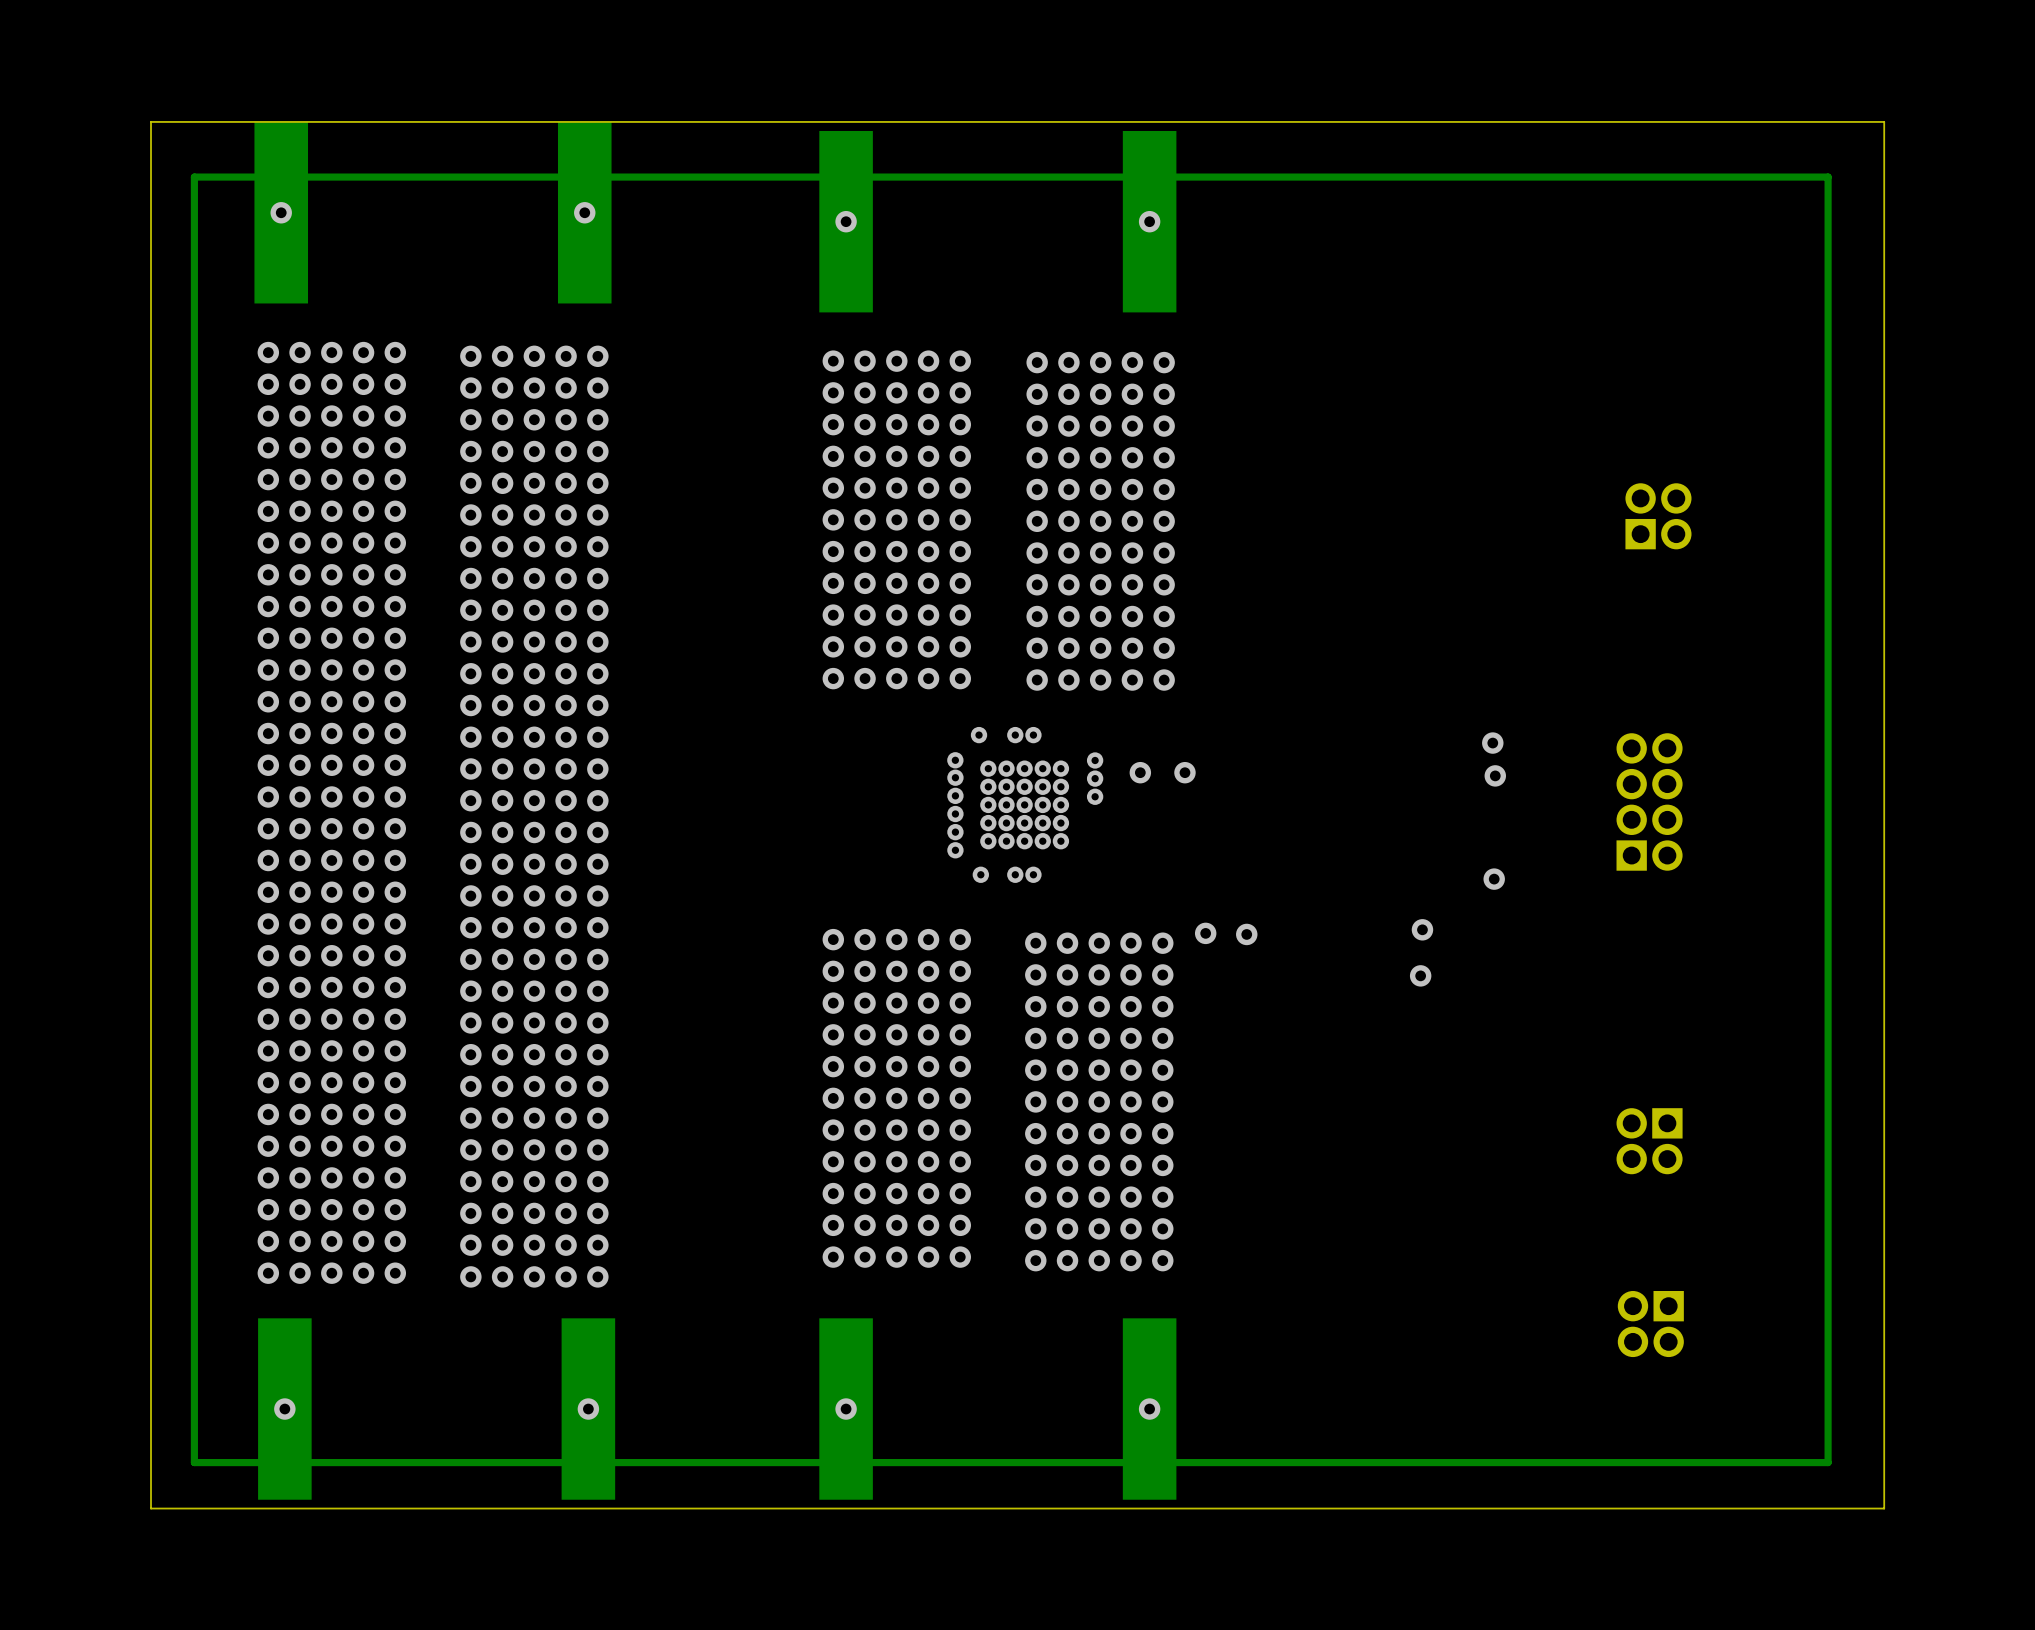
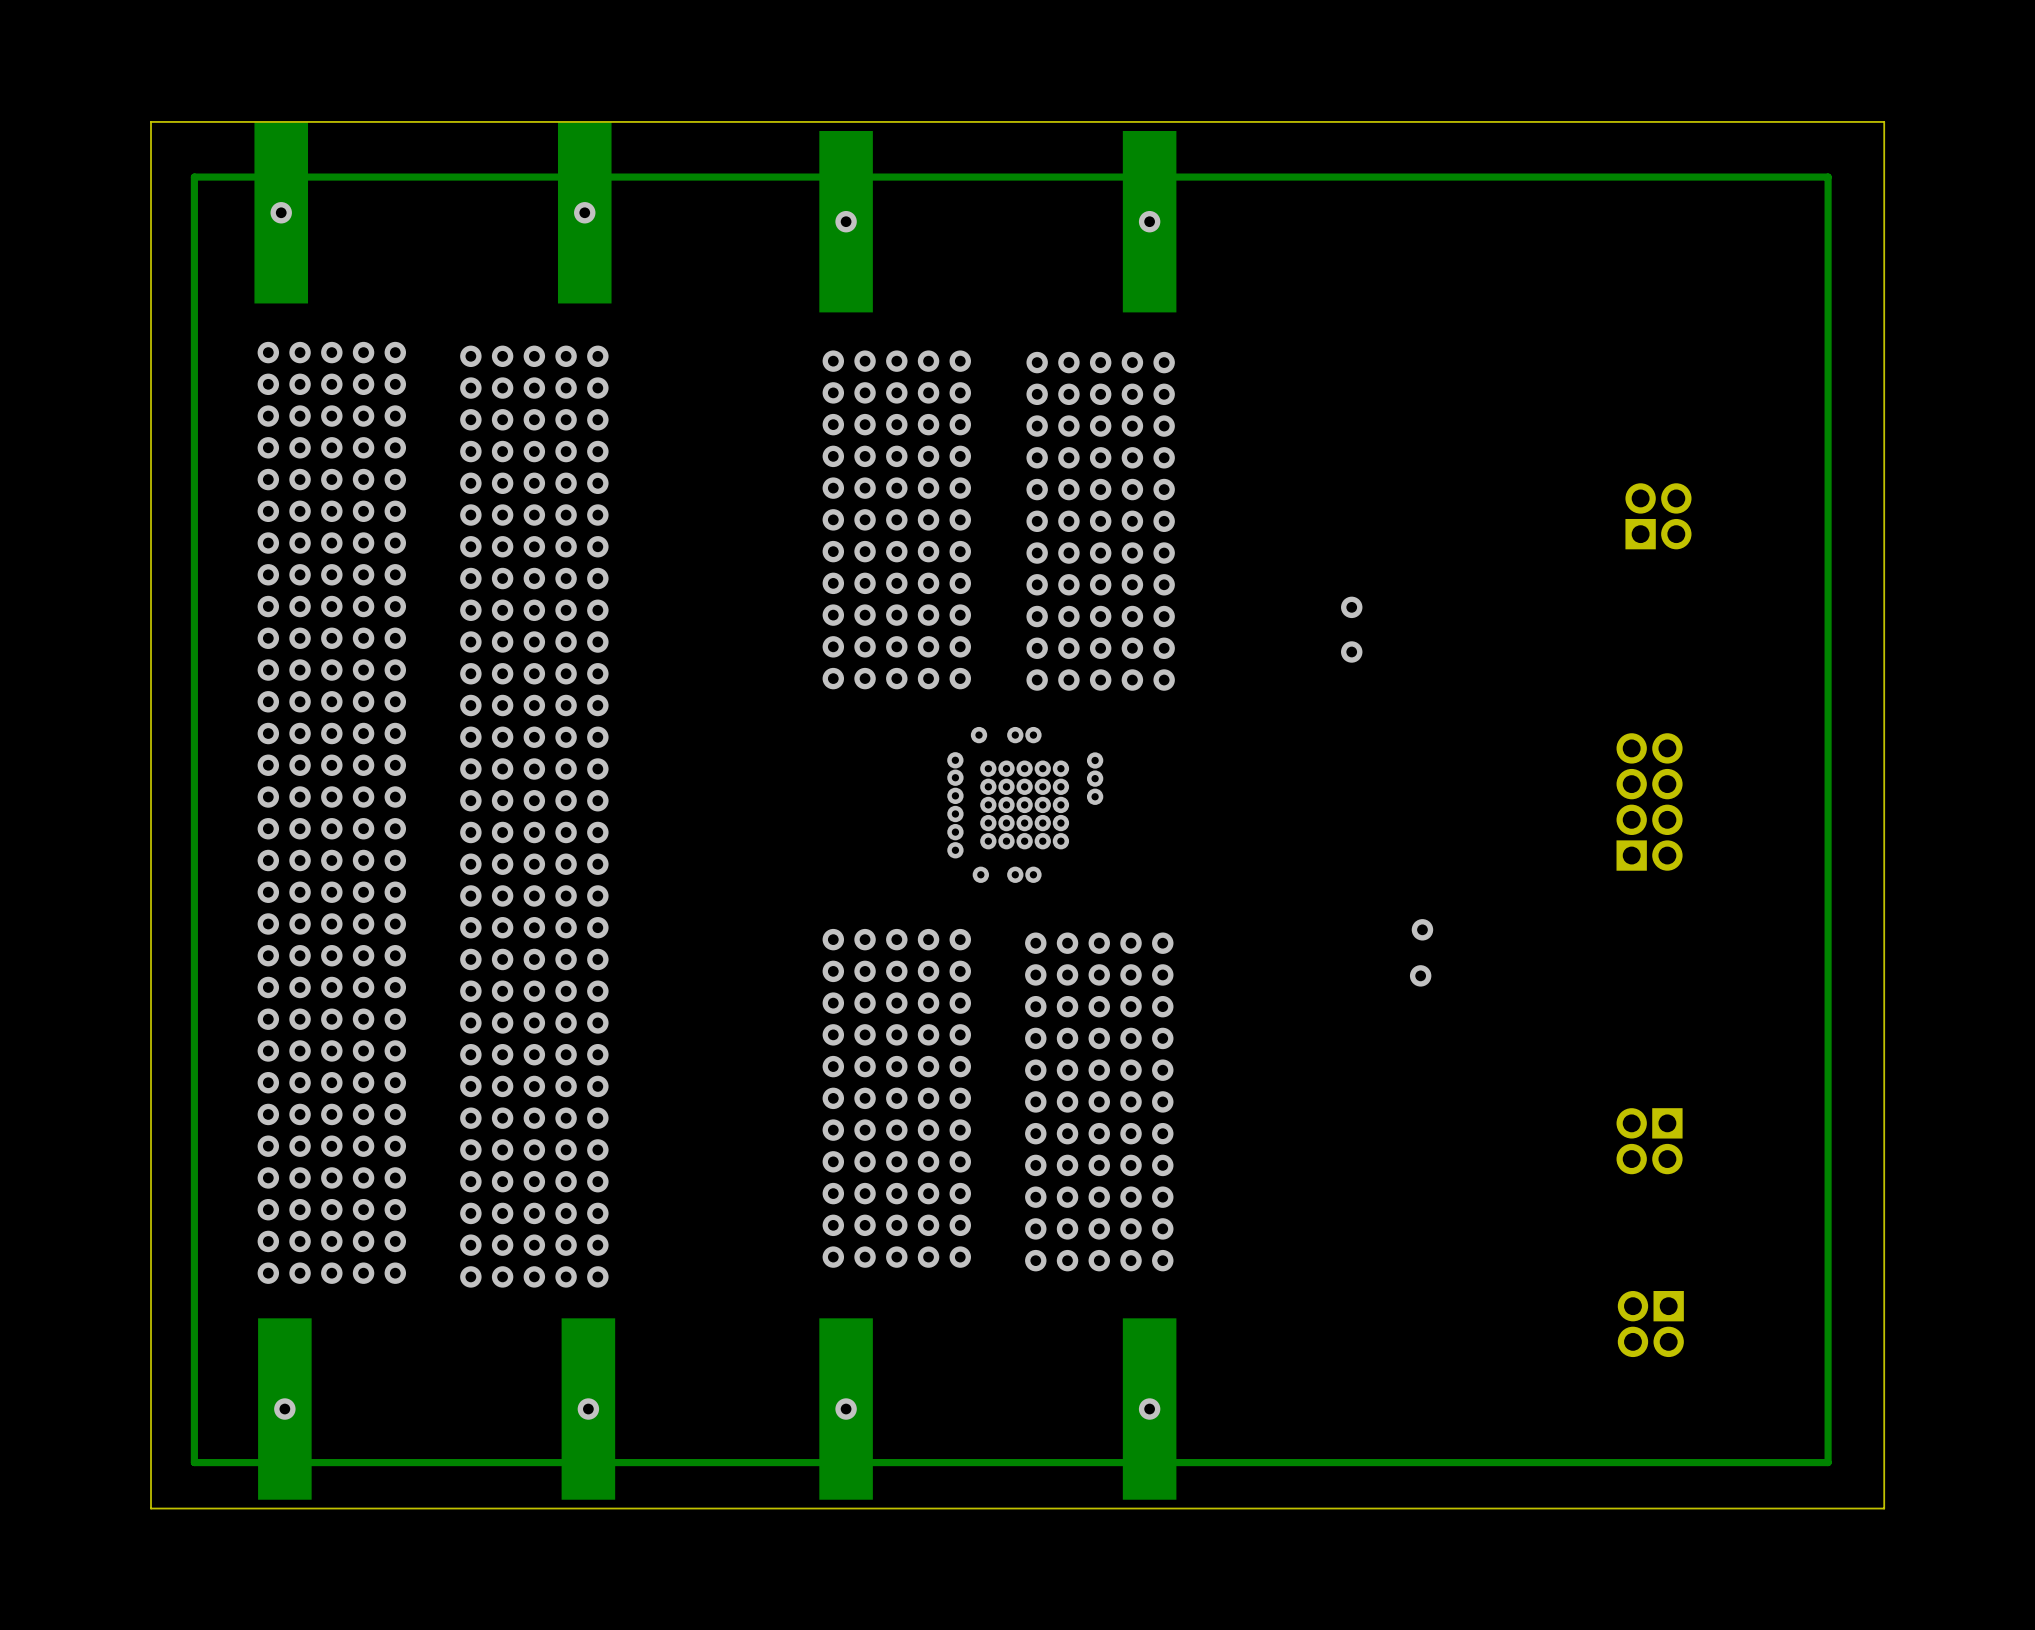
via: none -> (1351, 607)
via: none -> (1351, 651)
via: (1492, 743) -> none
via: (1140, 772) -> none
via: (1184, 772) -> none
via: (1495, 775) -> none
via: (1494, 879) -> none
via: (1205, 933) -> none
via: (1246, 934) -> none

